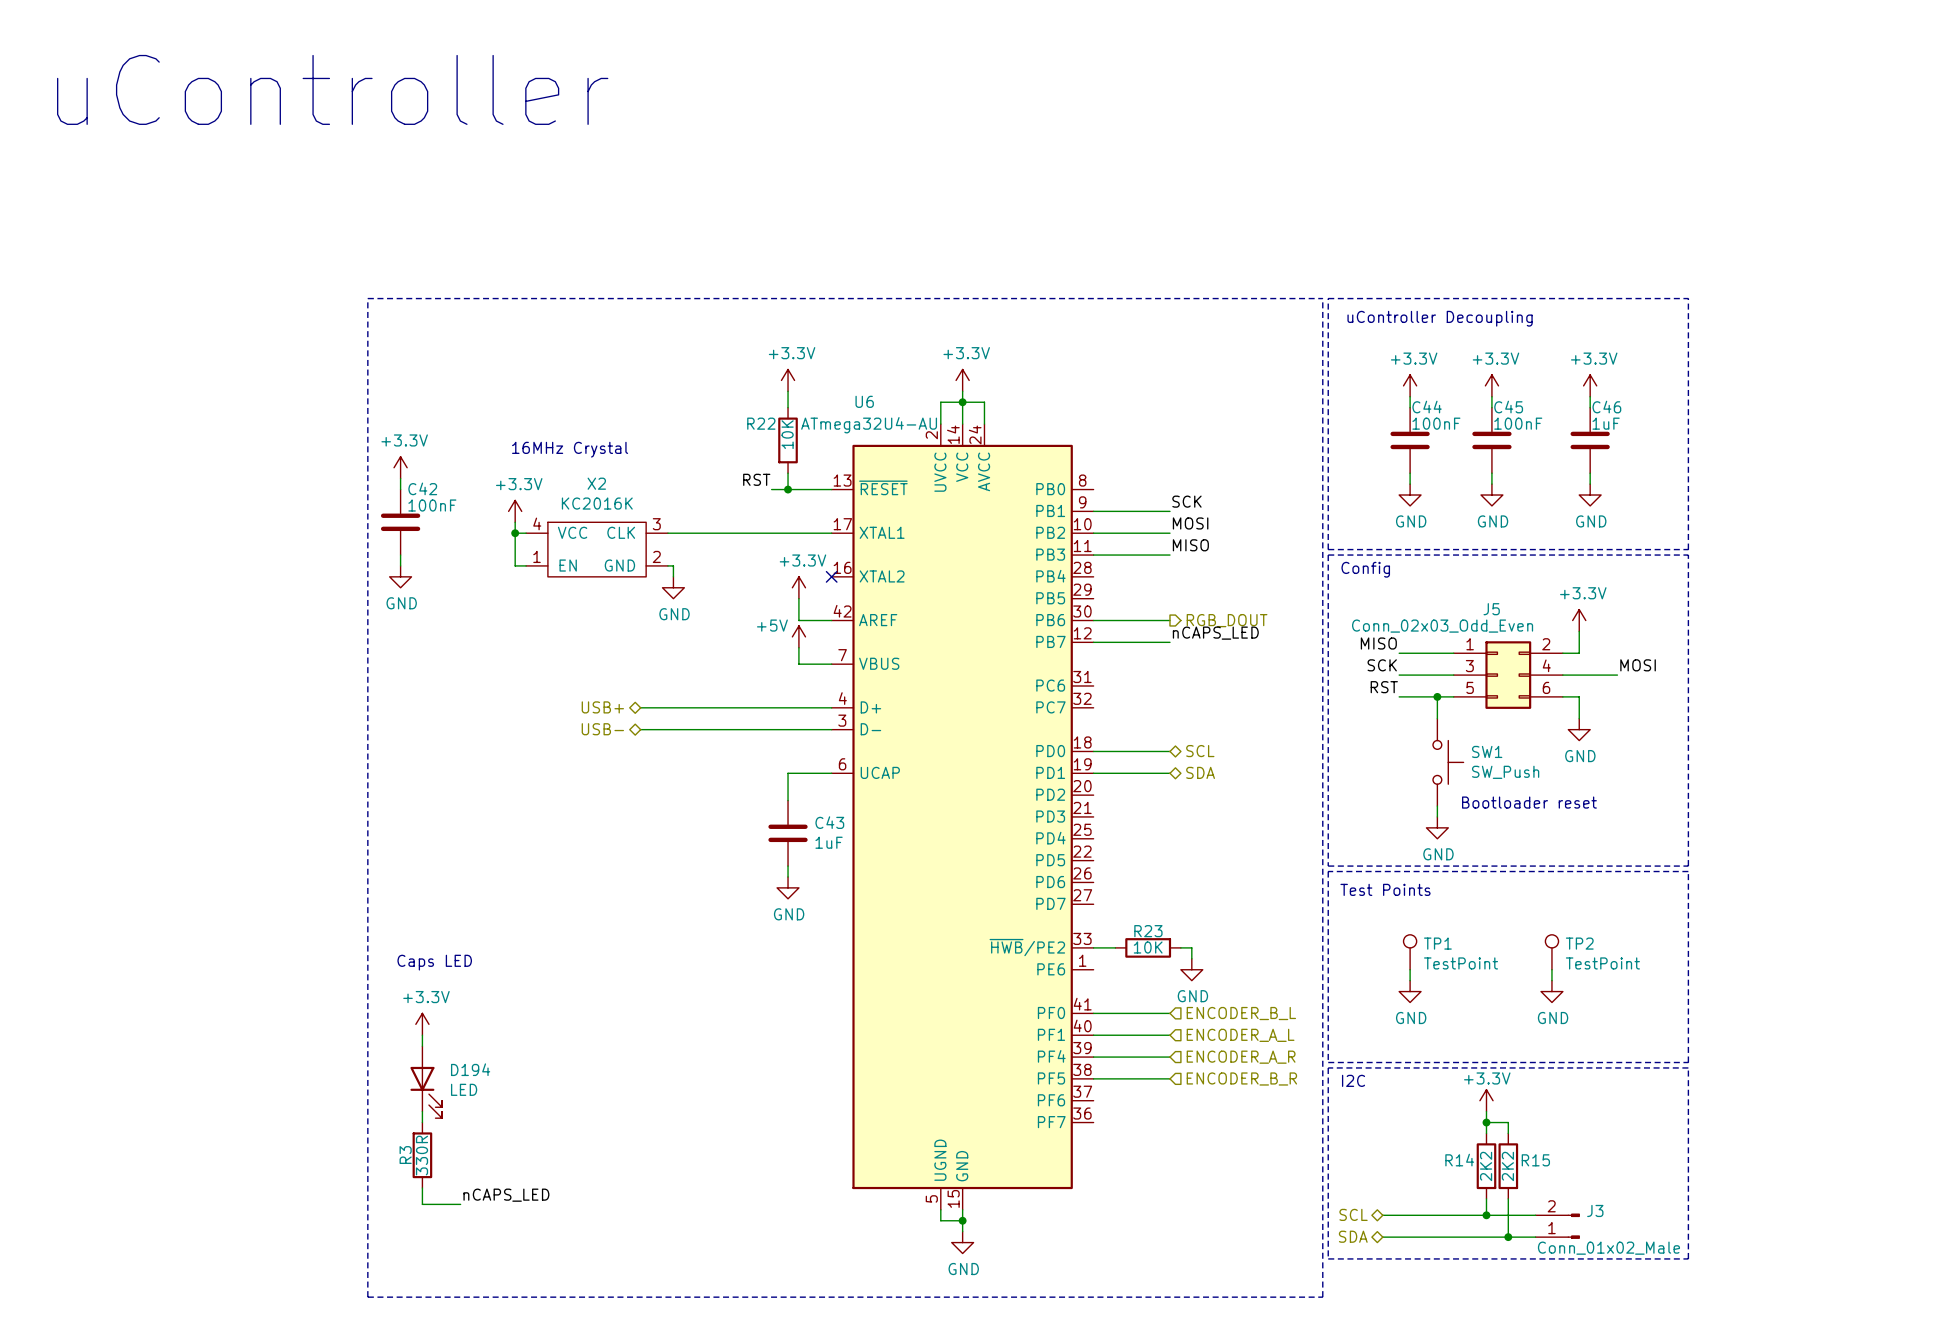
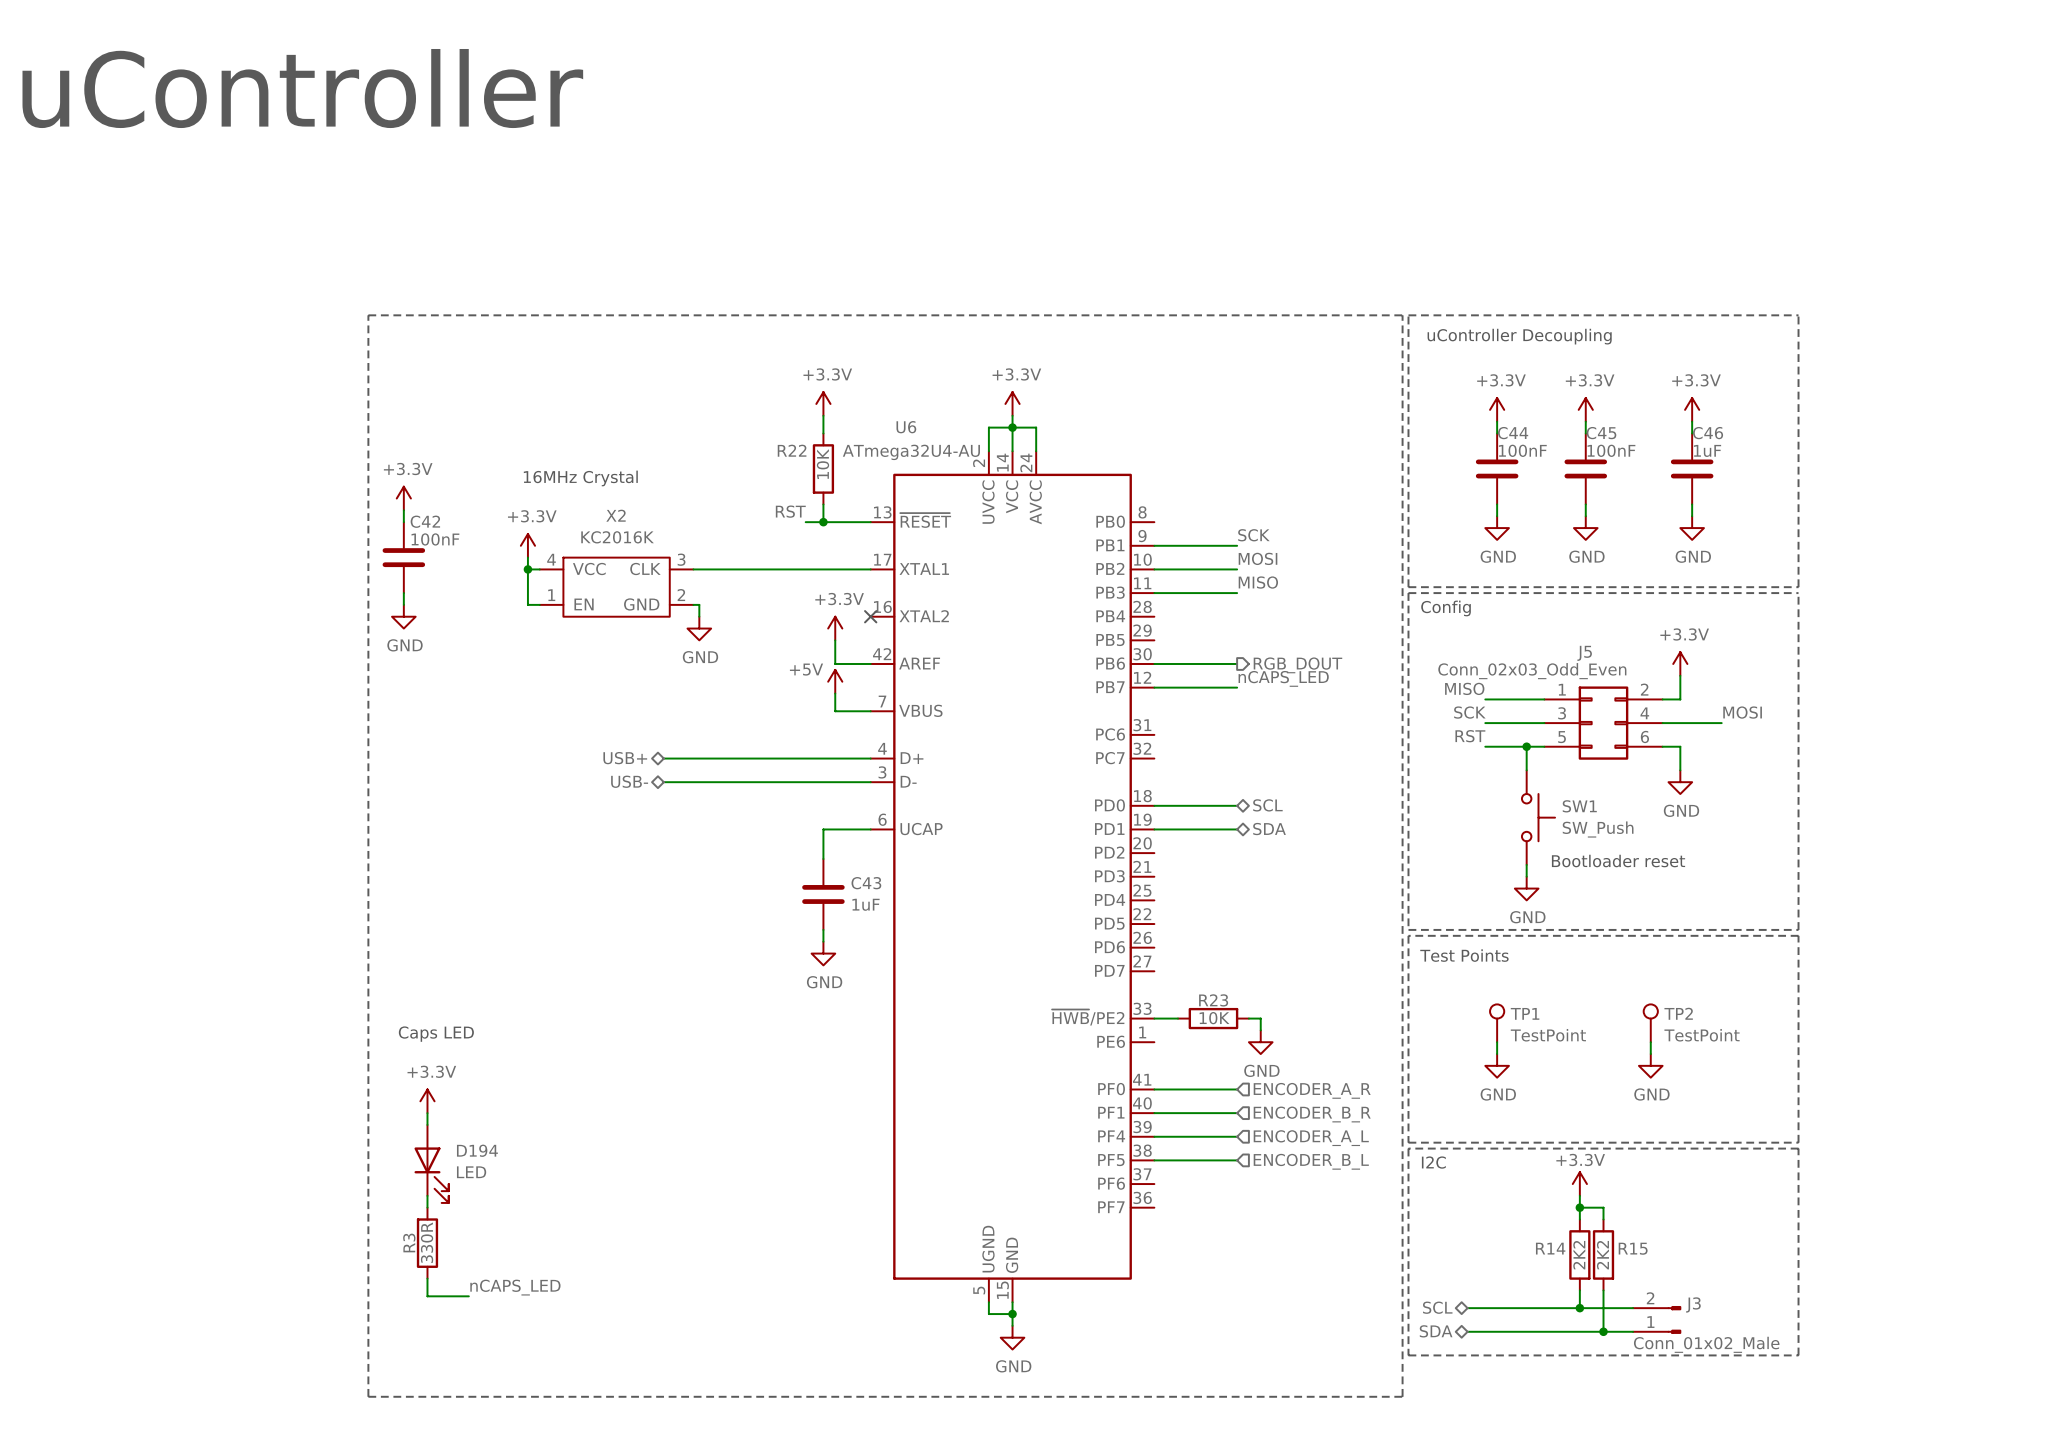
hierarchical label: ENCODER_B_L (1241, 1013) -> ENCODER_A_R (1312, 1090)
hierarchical label: ENCODER_A_L (1240, 1035) -> ENCODER_B_R (1312, 1114)
hierarchical label: ENCODER_A_R (1241, 1057) -> ENCODER_A_L (1311, 1138)
hierarchical label: ENCODER_B_R (1241, 1078) -> ENCODER_B_L (1311, 1161)

